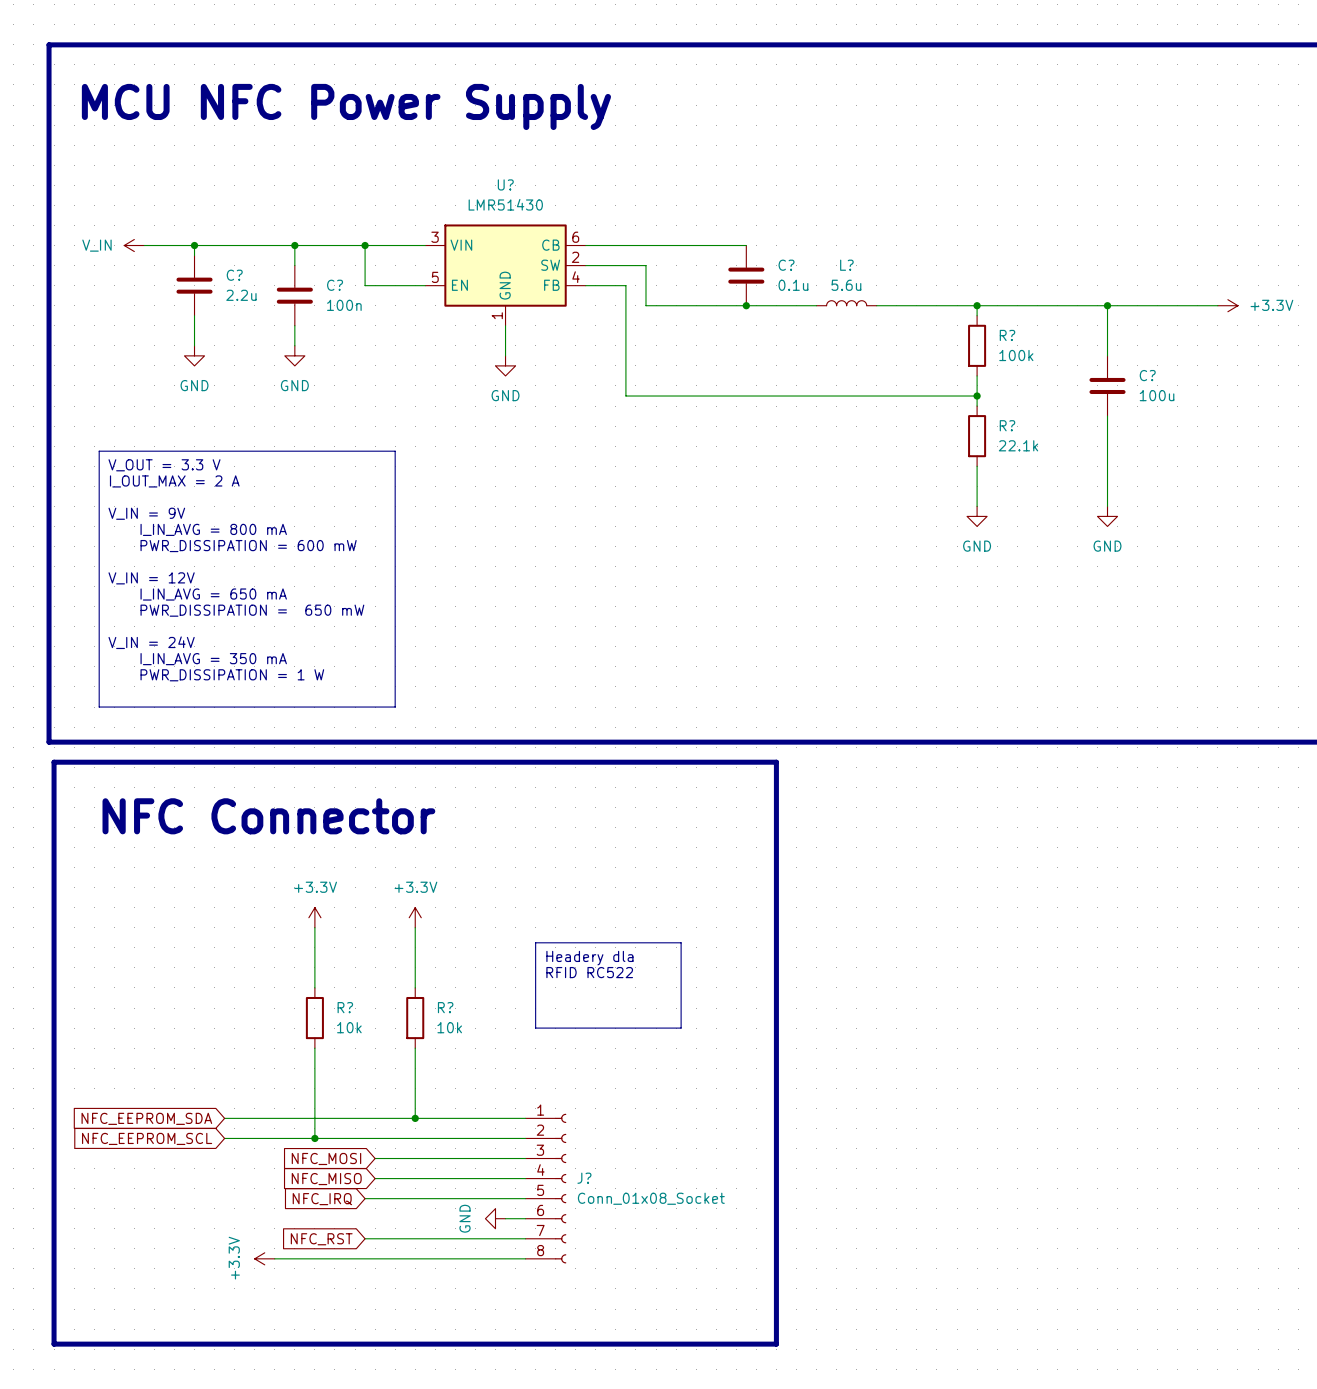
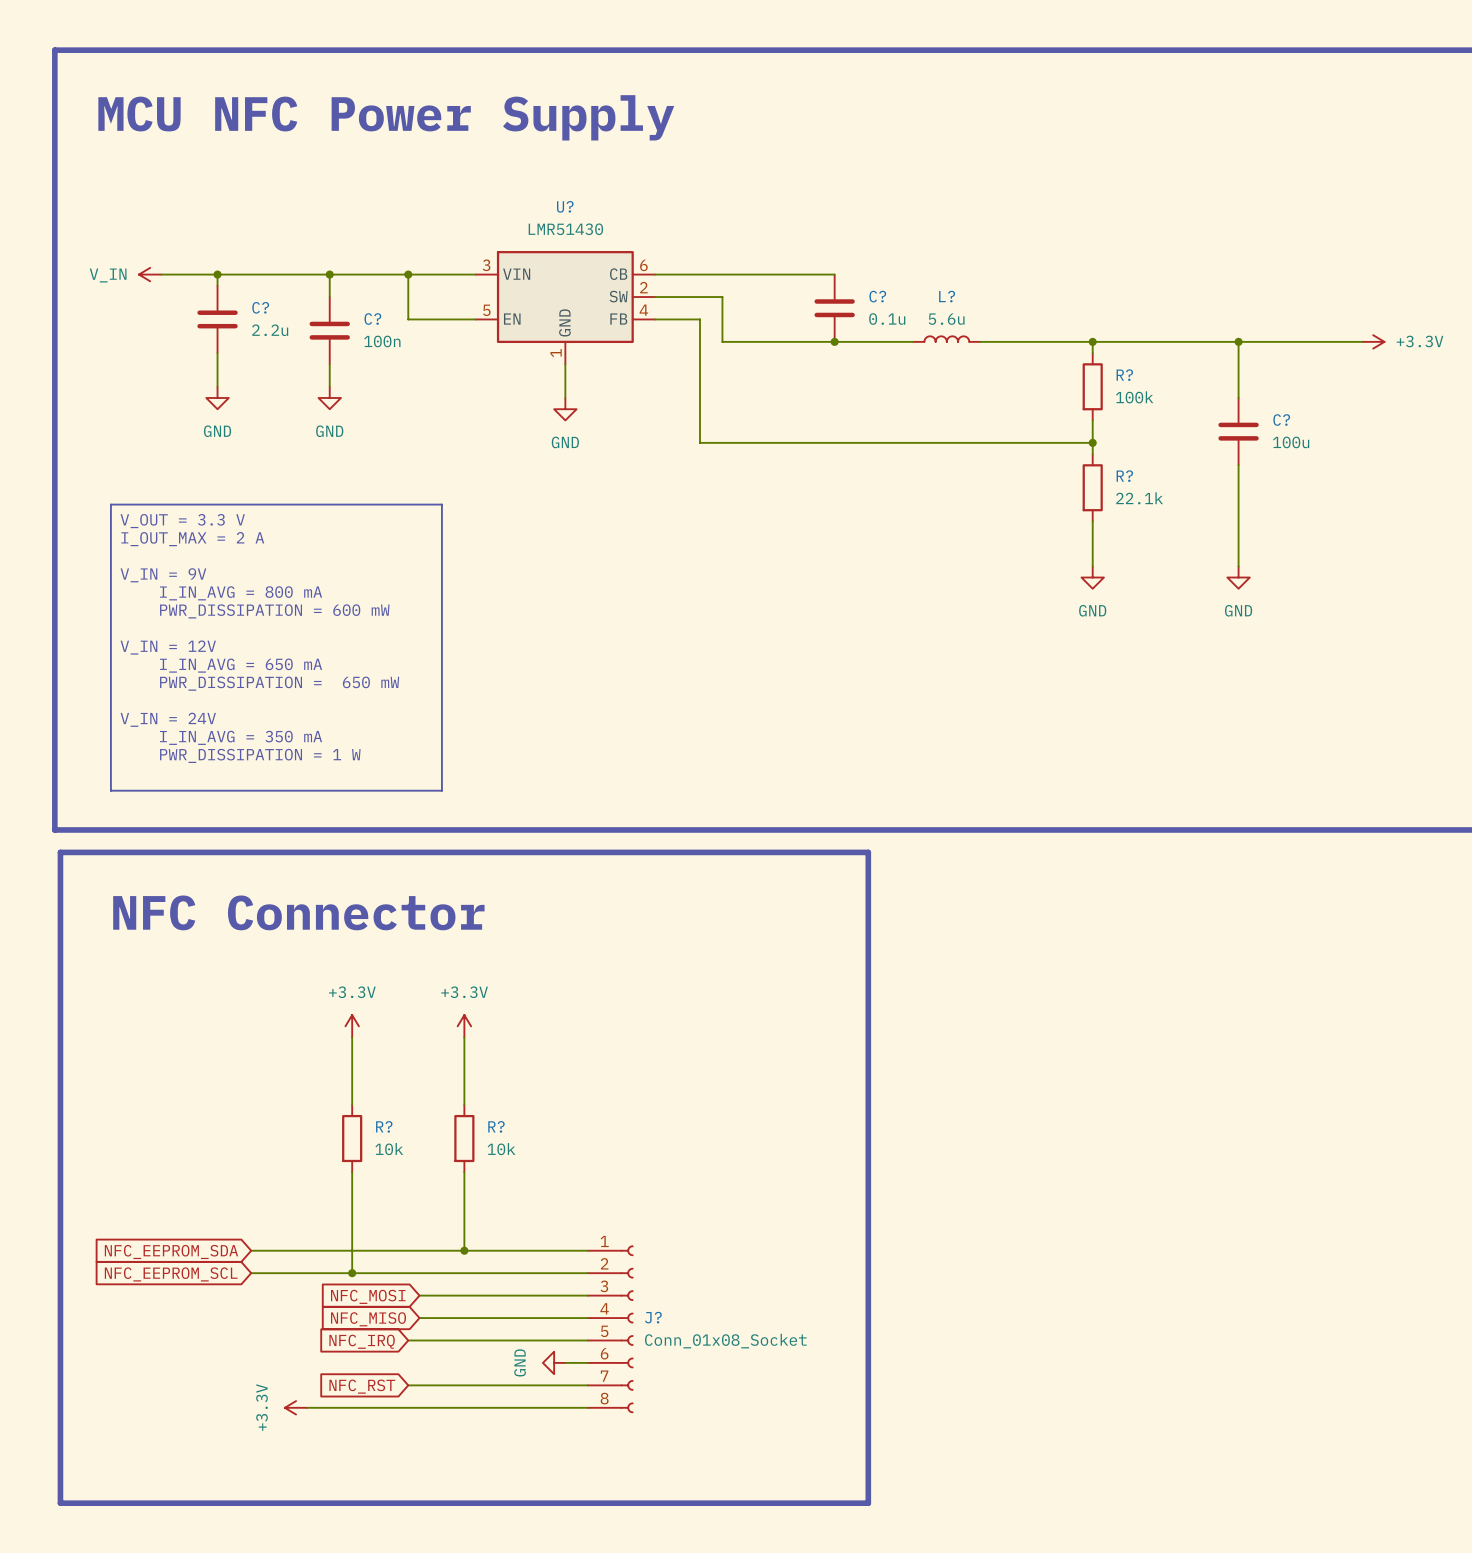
line: (535, 942) (681, 942) (681, 1028) (535, 1028) (535, 942) -> none
text: Headery dla (589, 958) -> none
text: RFID RC522 (589, 972) -> none

